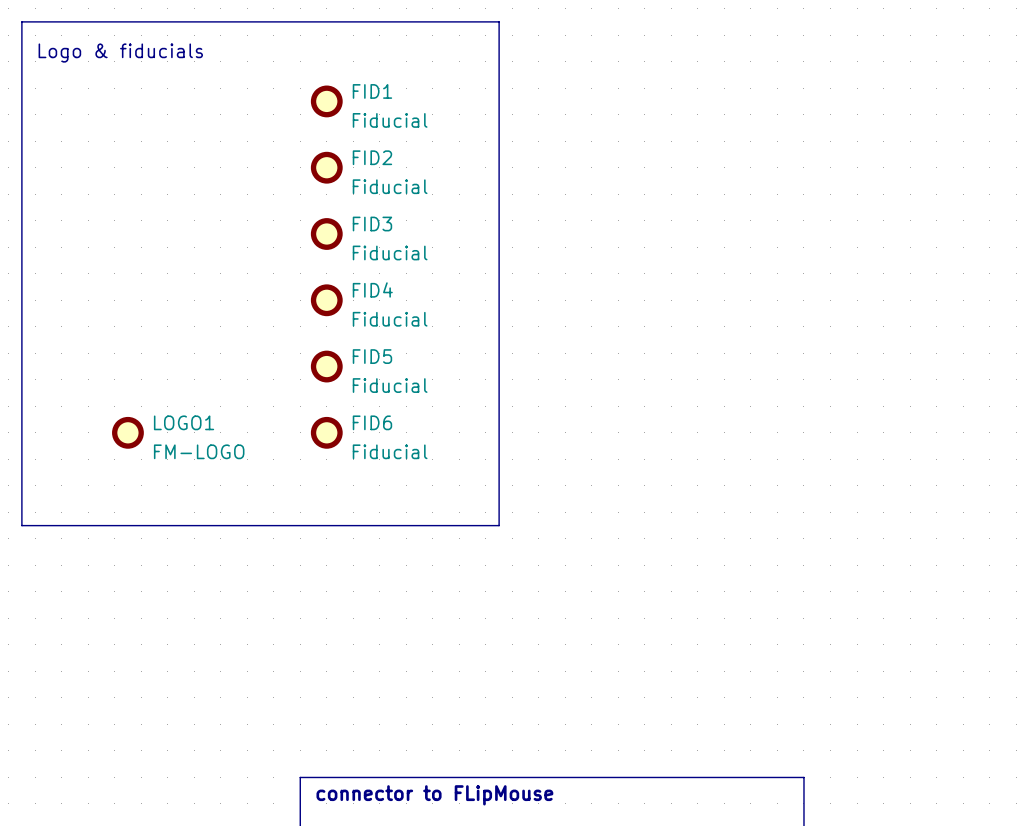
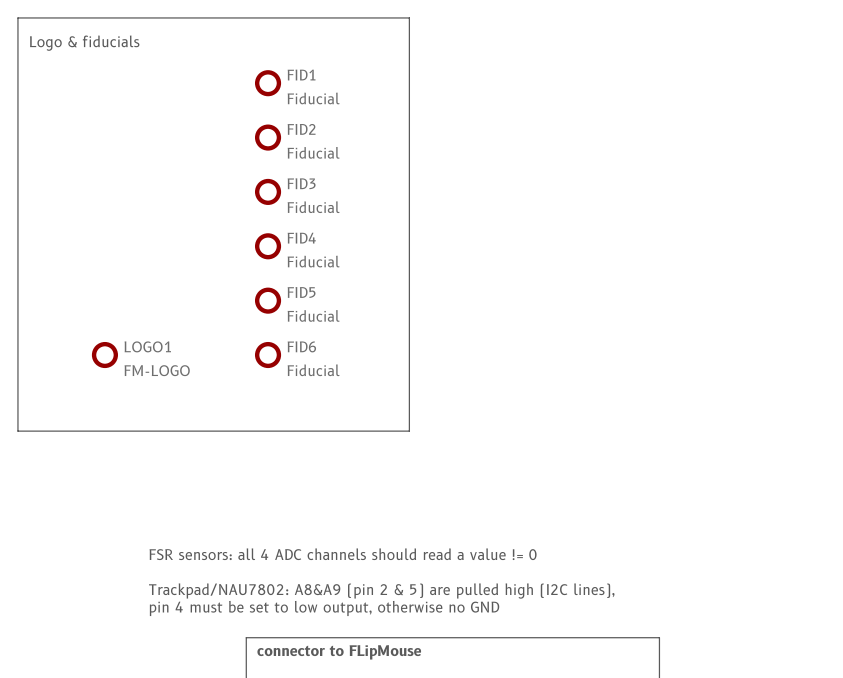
text: none -> FSR sensors: all 4 ADC channels should read a value != 0 (343, 554)
text: none -> Trackpad/NAU7802: A8&A9 (pin 2 & 5) are pulled high (I2C lines), (381, 591)
text: none -> pin 4 must be set to low output, otherwise no GND (324, 608)

